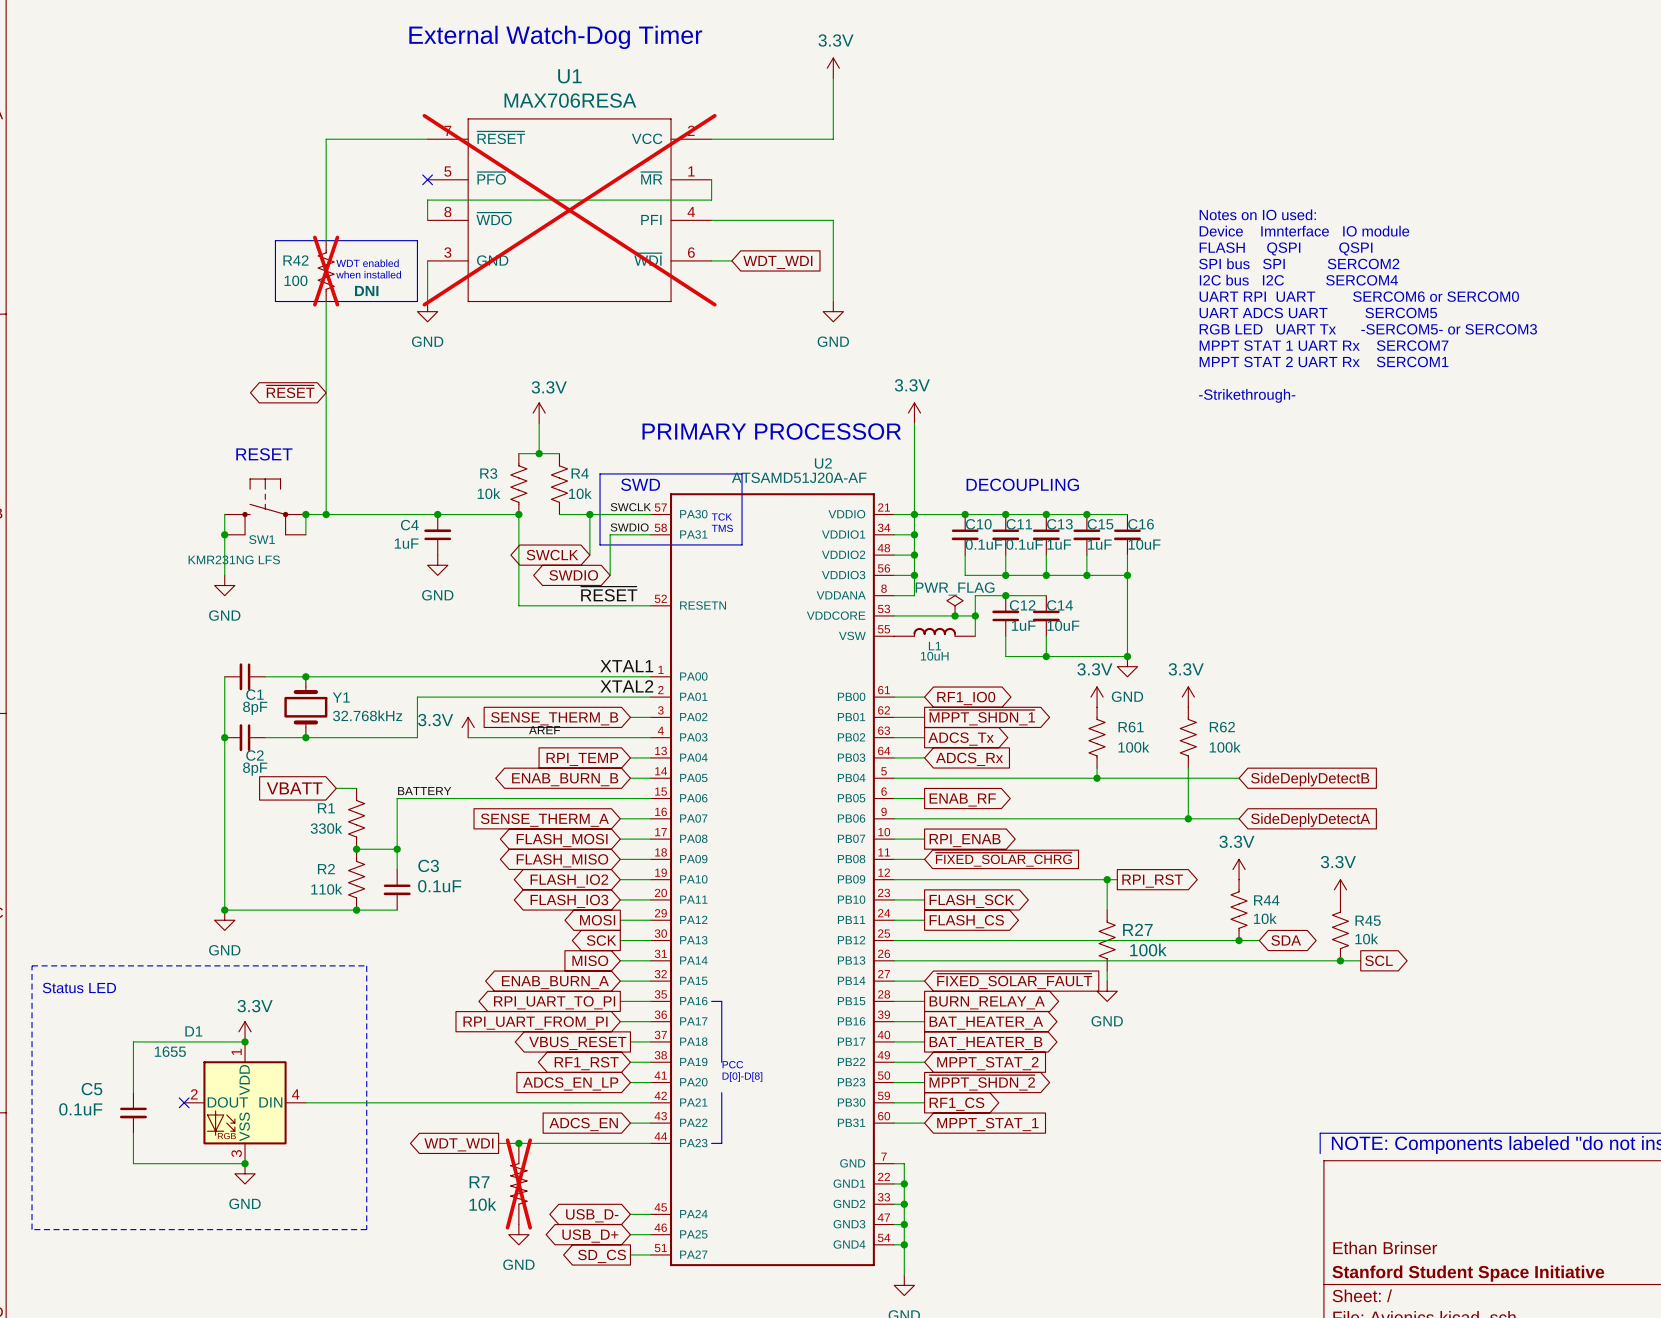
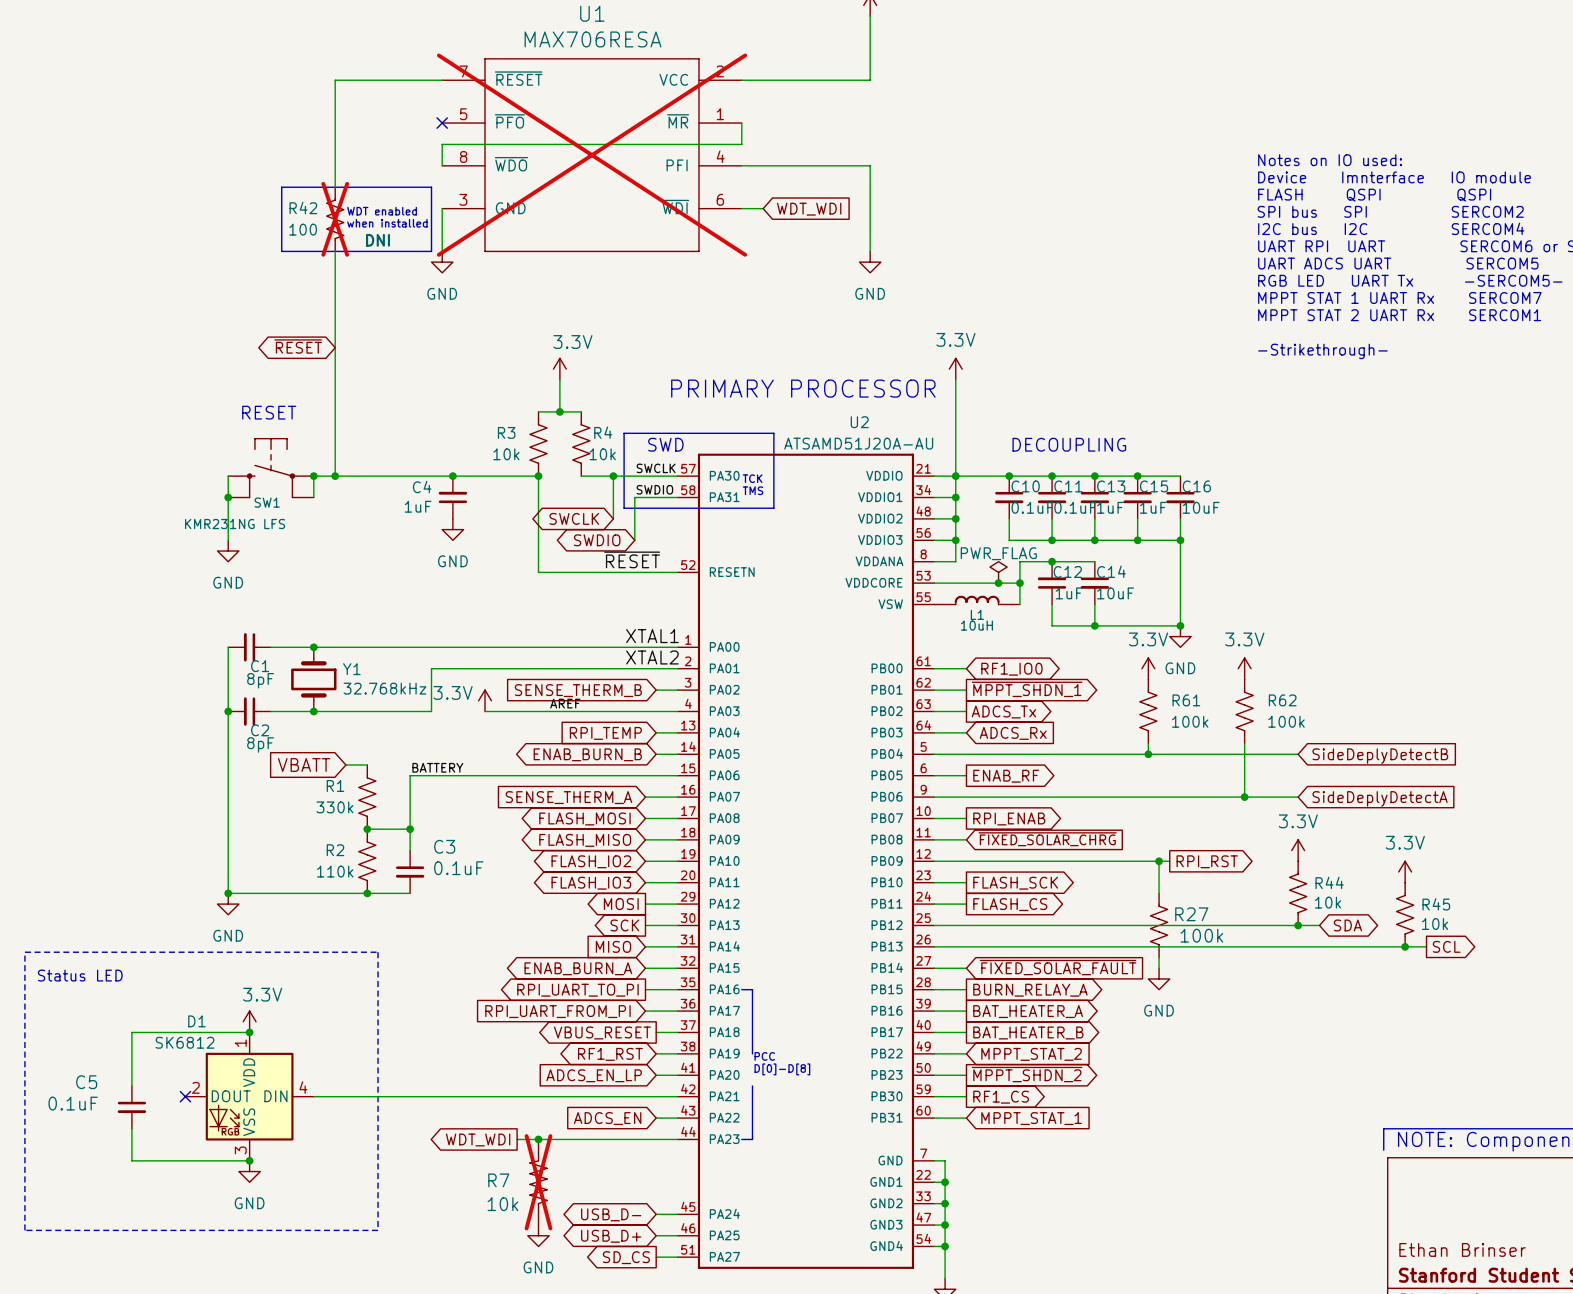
U2 value: ATSAMD51J20A-AF (799, 477) -> ATSAMD51J20A-AU (858, 443)
D1 value: 1655 (170, 1051) -> SK6812 (184, 1042)

